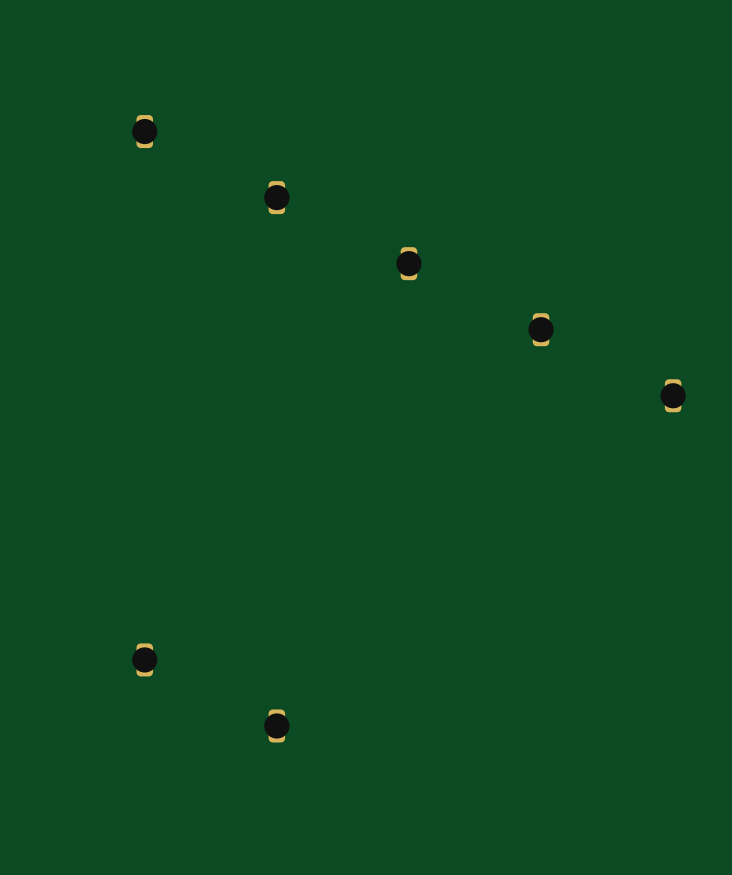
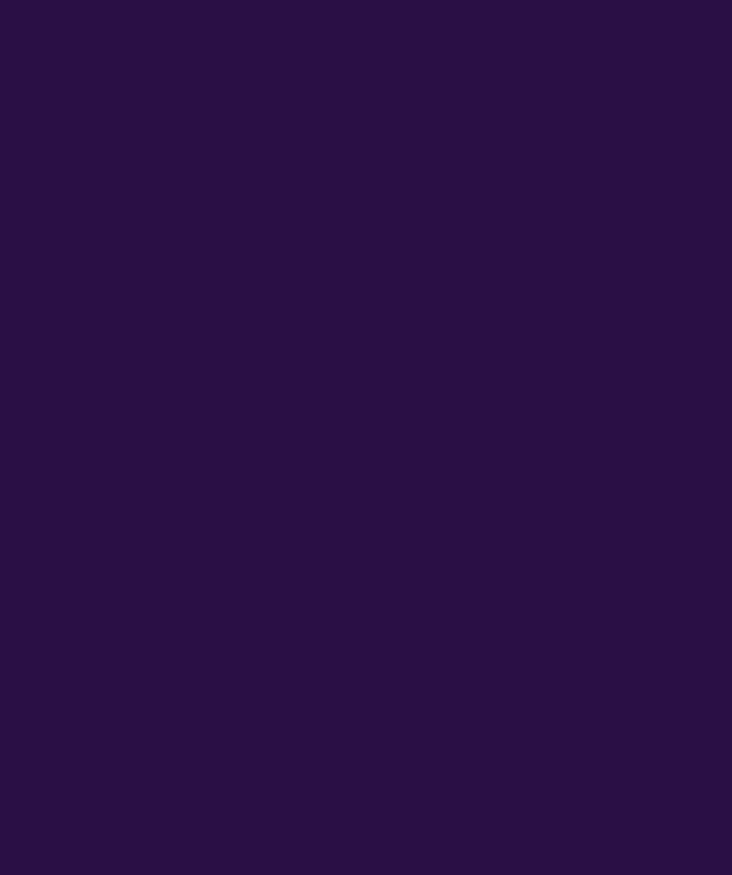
part: (144, 131) -> none
part: (276, 197) -> none
part: (408, 263) -> none
part: (541, 329) -> none
part: (673, 395) -> none
part: (144, 659) -> none
part: (276, 725) -> none

